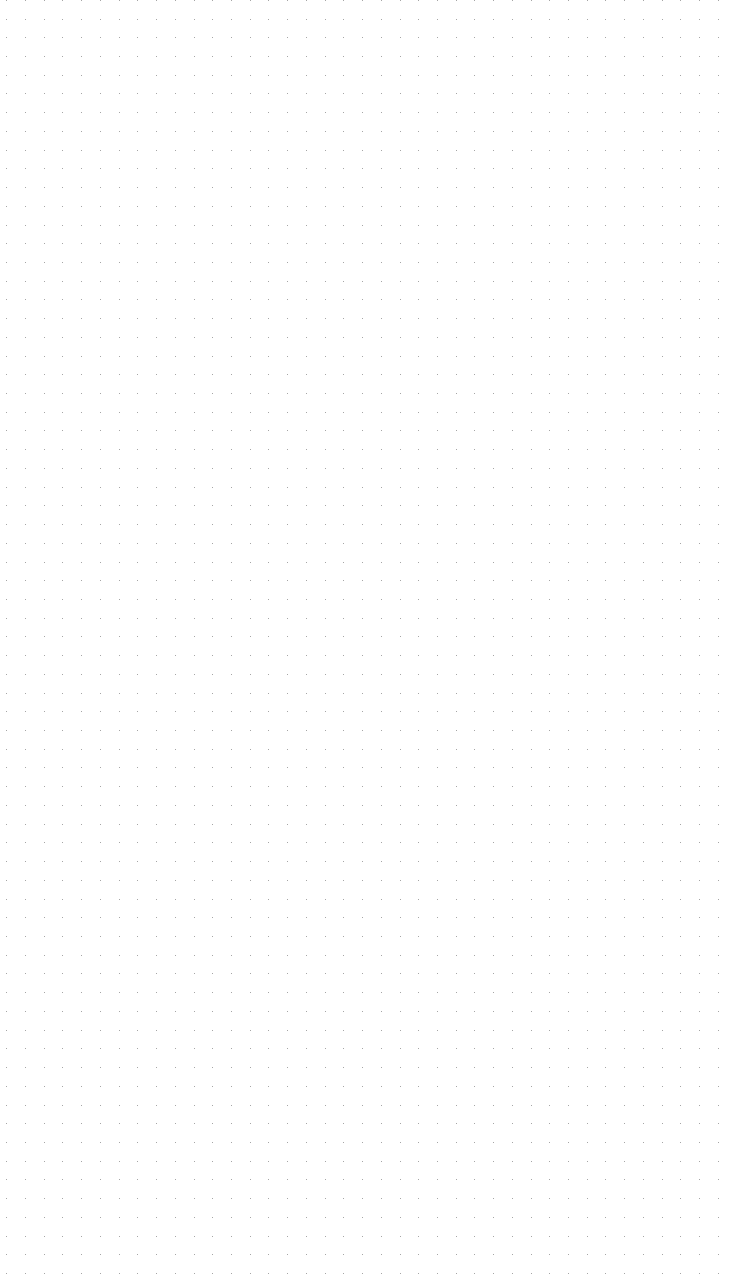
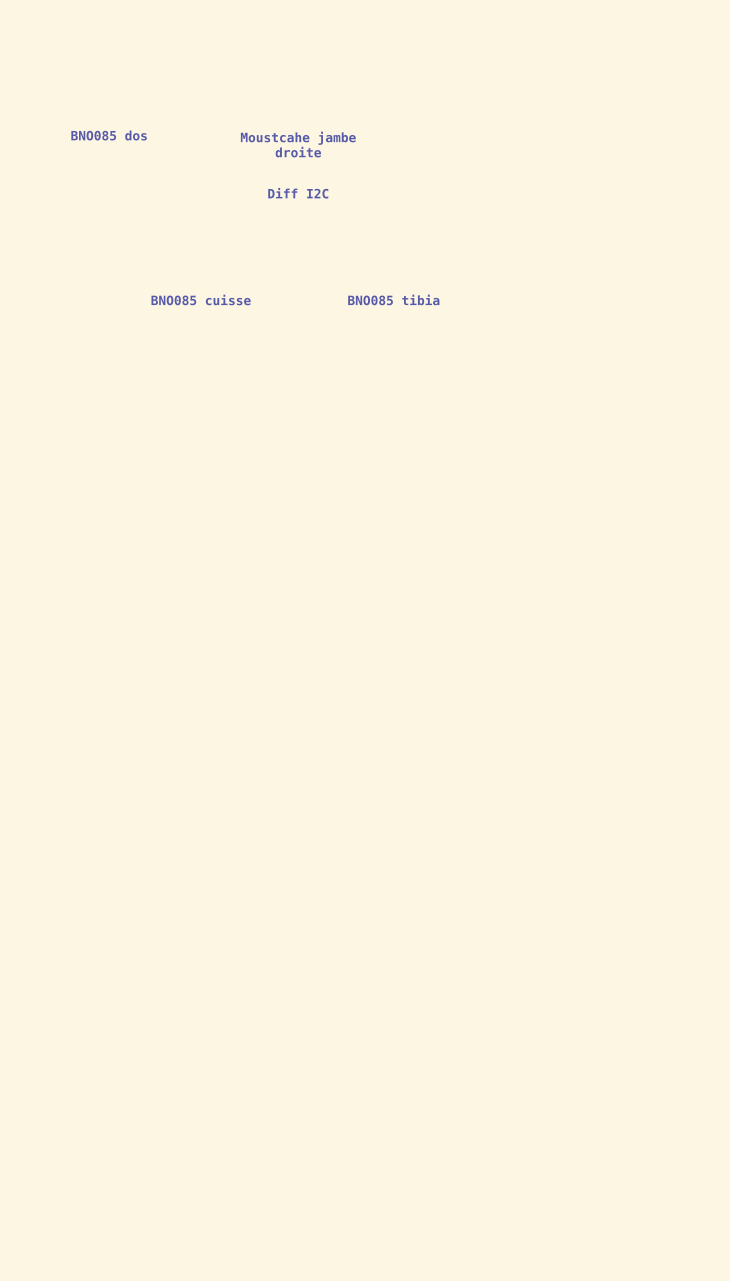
text: none -> BNO085 dos (109, 135)
text: none -> Moustcahe jambe (298, 138)
text: none -> droite (298, 152)
text: none -> Diff I2C (298, 193)
text: none -> BNO085 cuisse (201, 299)
text: none -> BNO085 tibia (393, 299)

